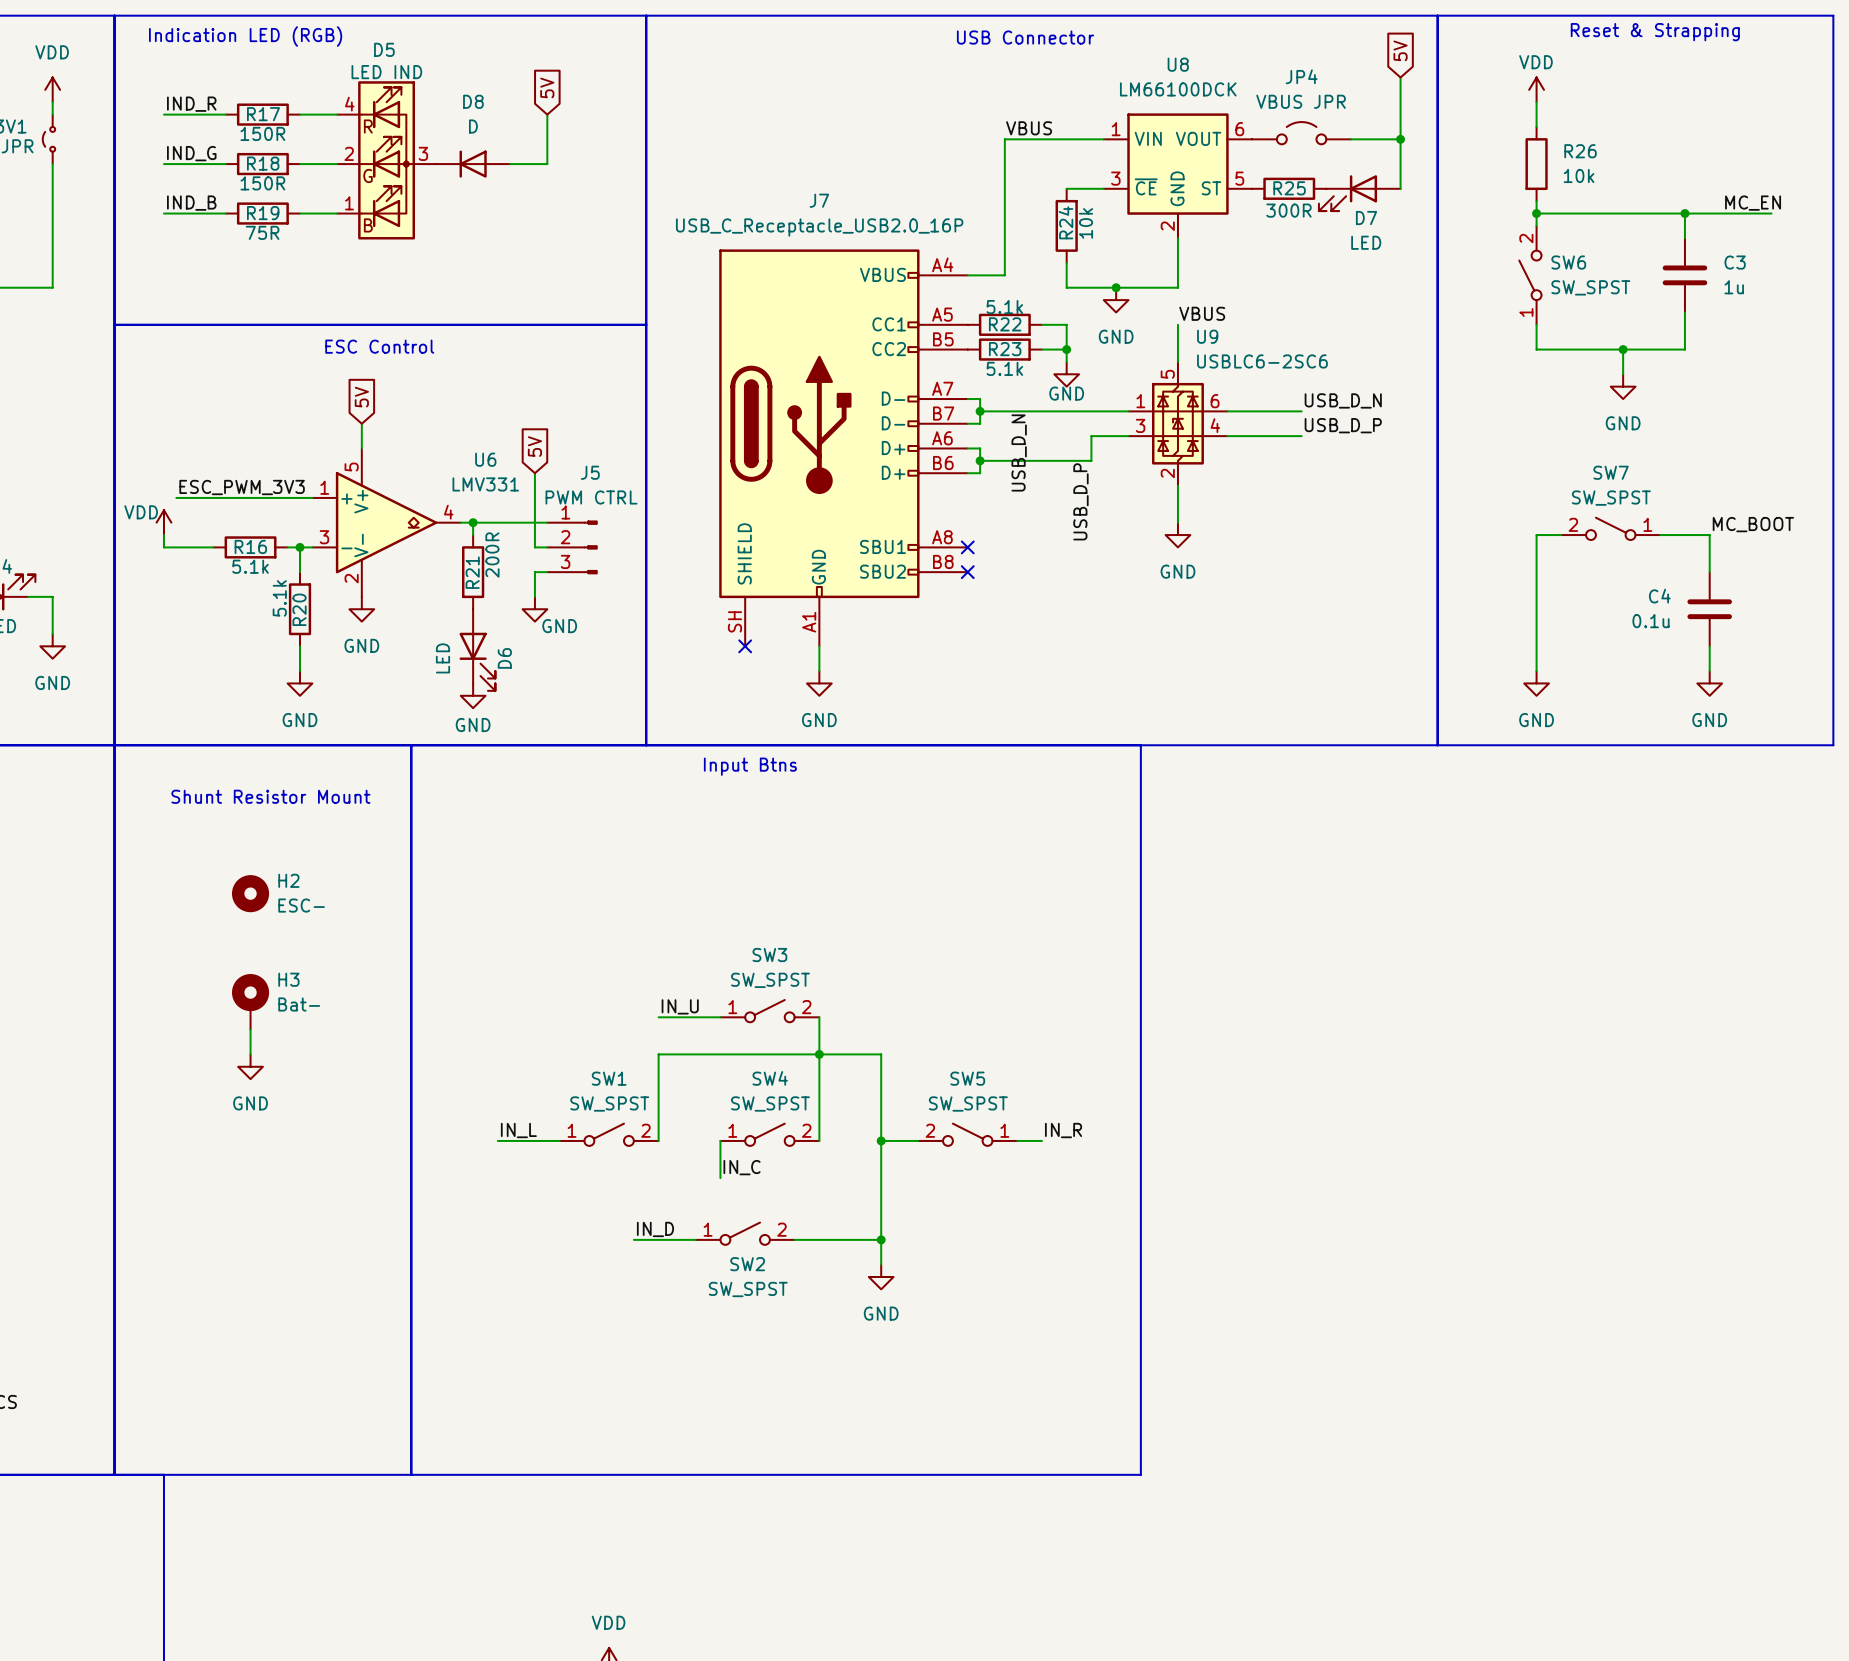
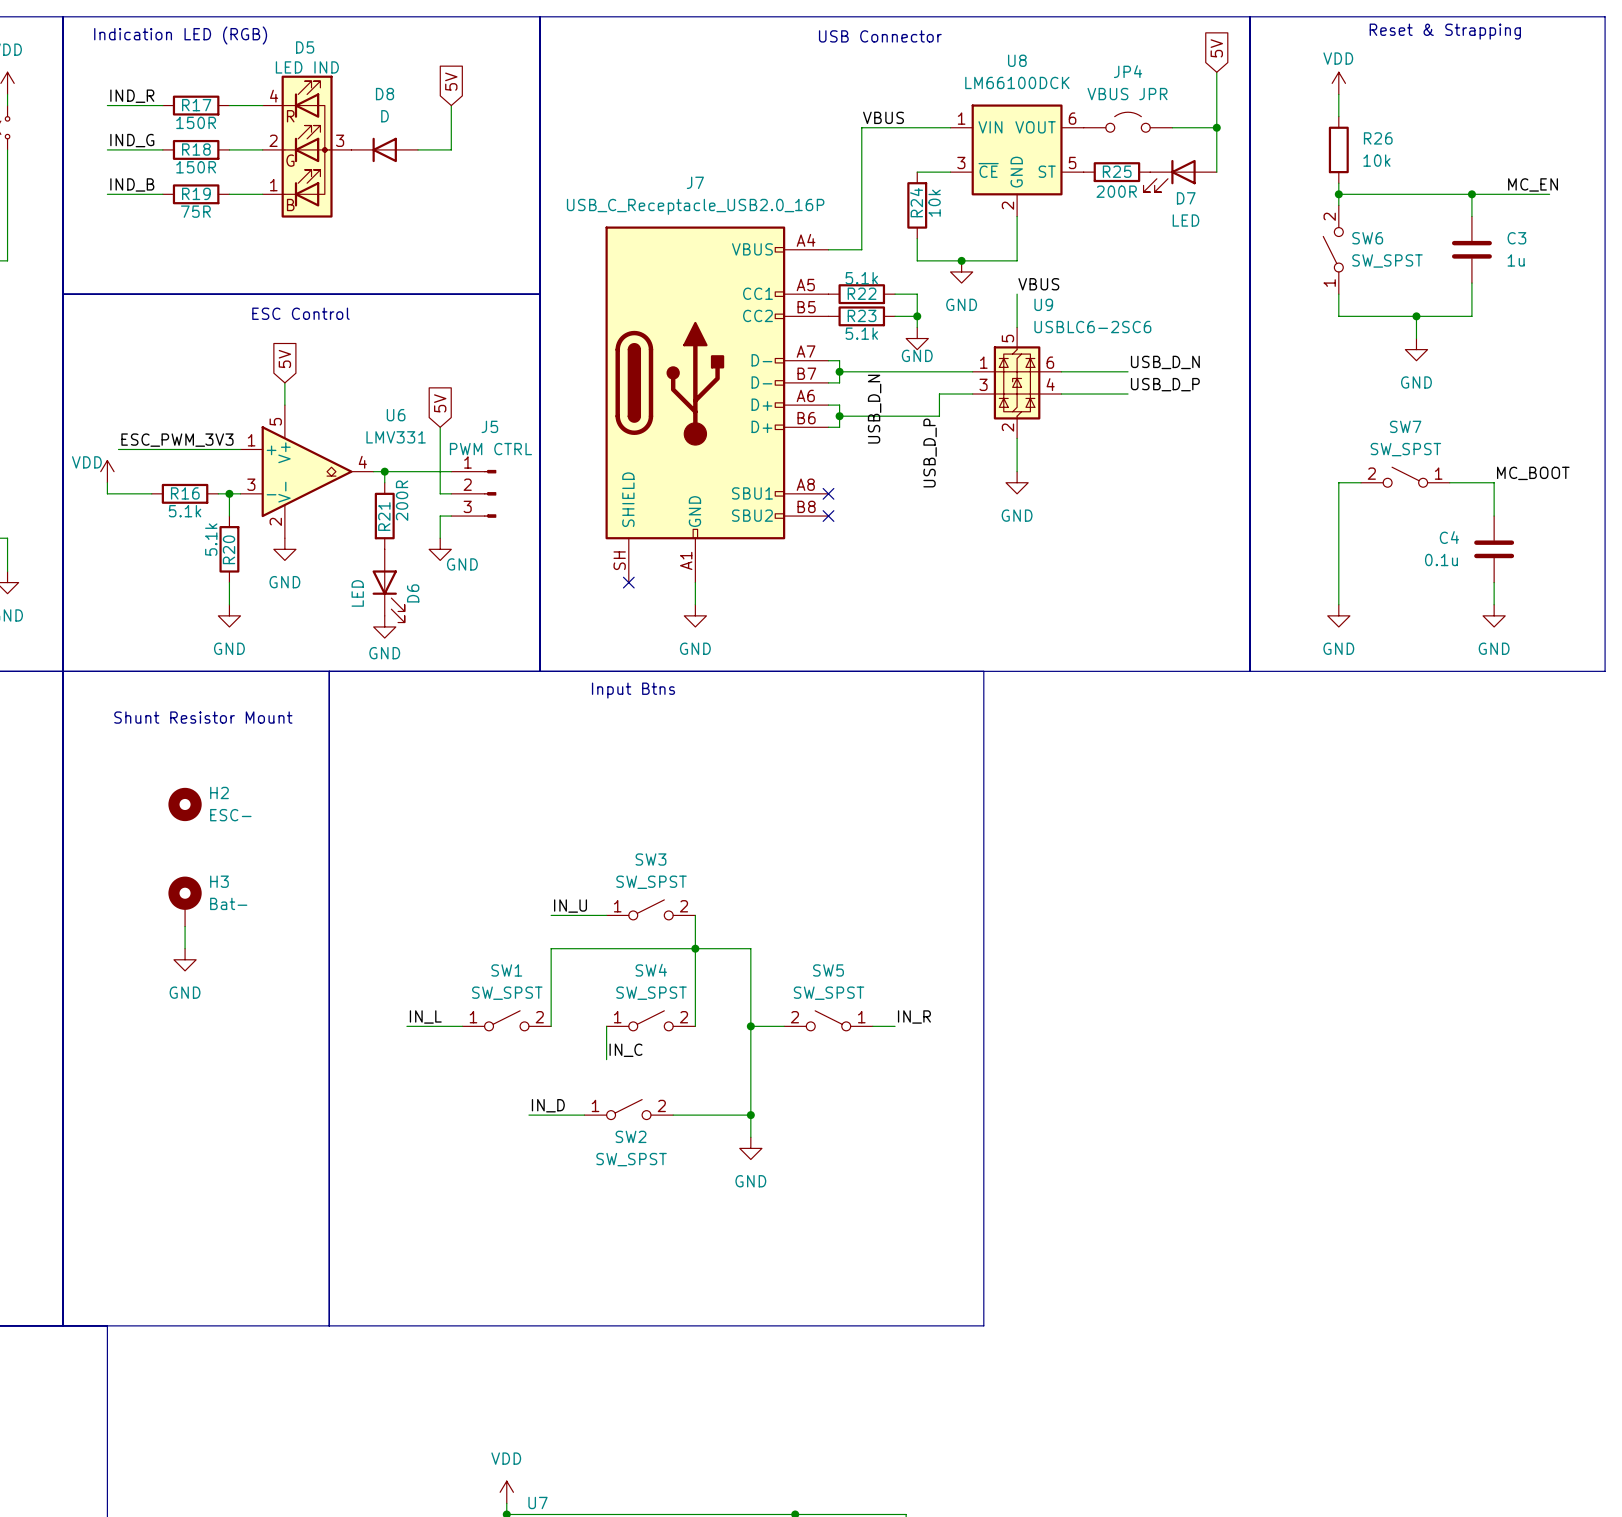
R25 value: 300R (1288, 210) -> 200R (1116, 191)

